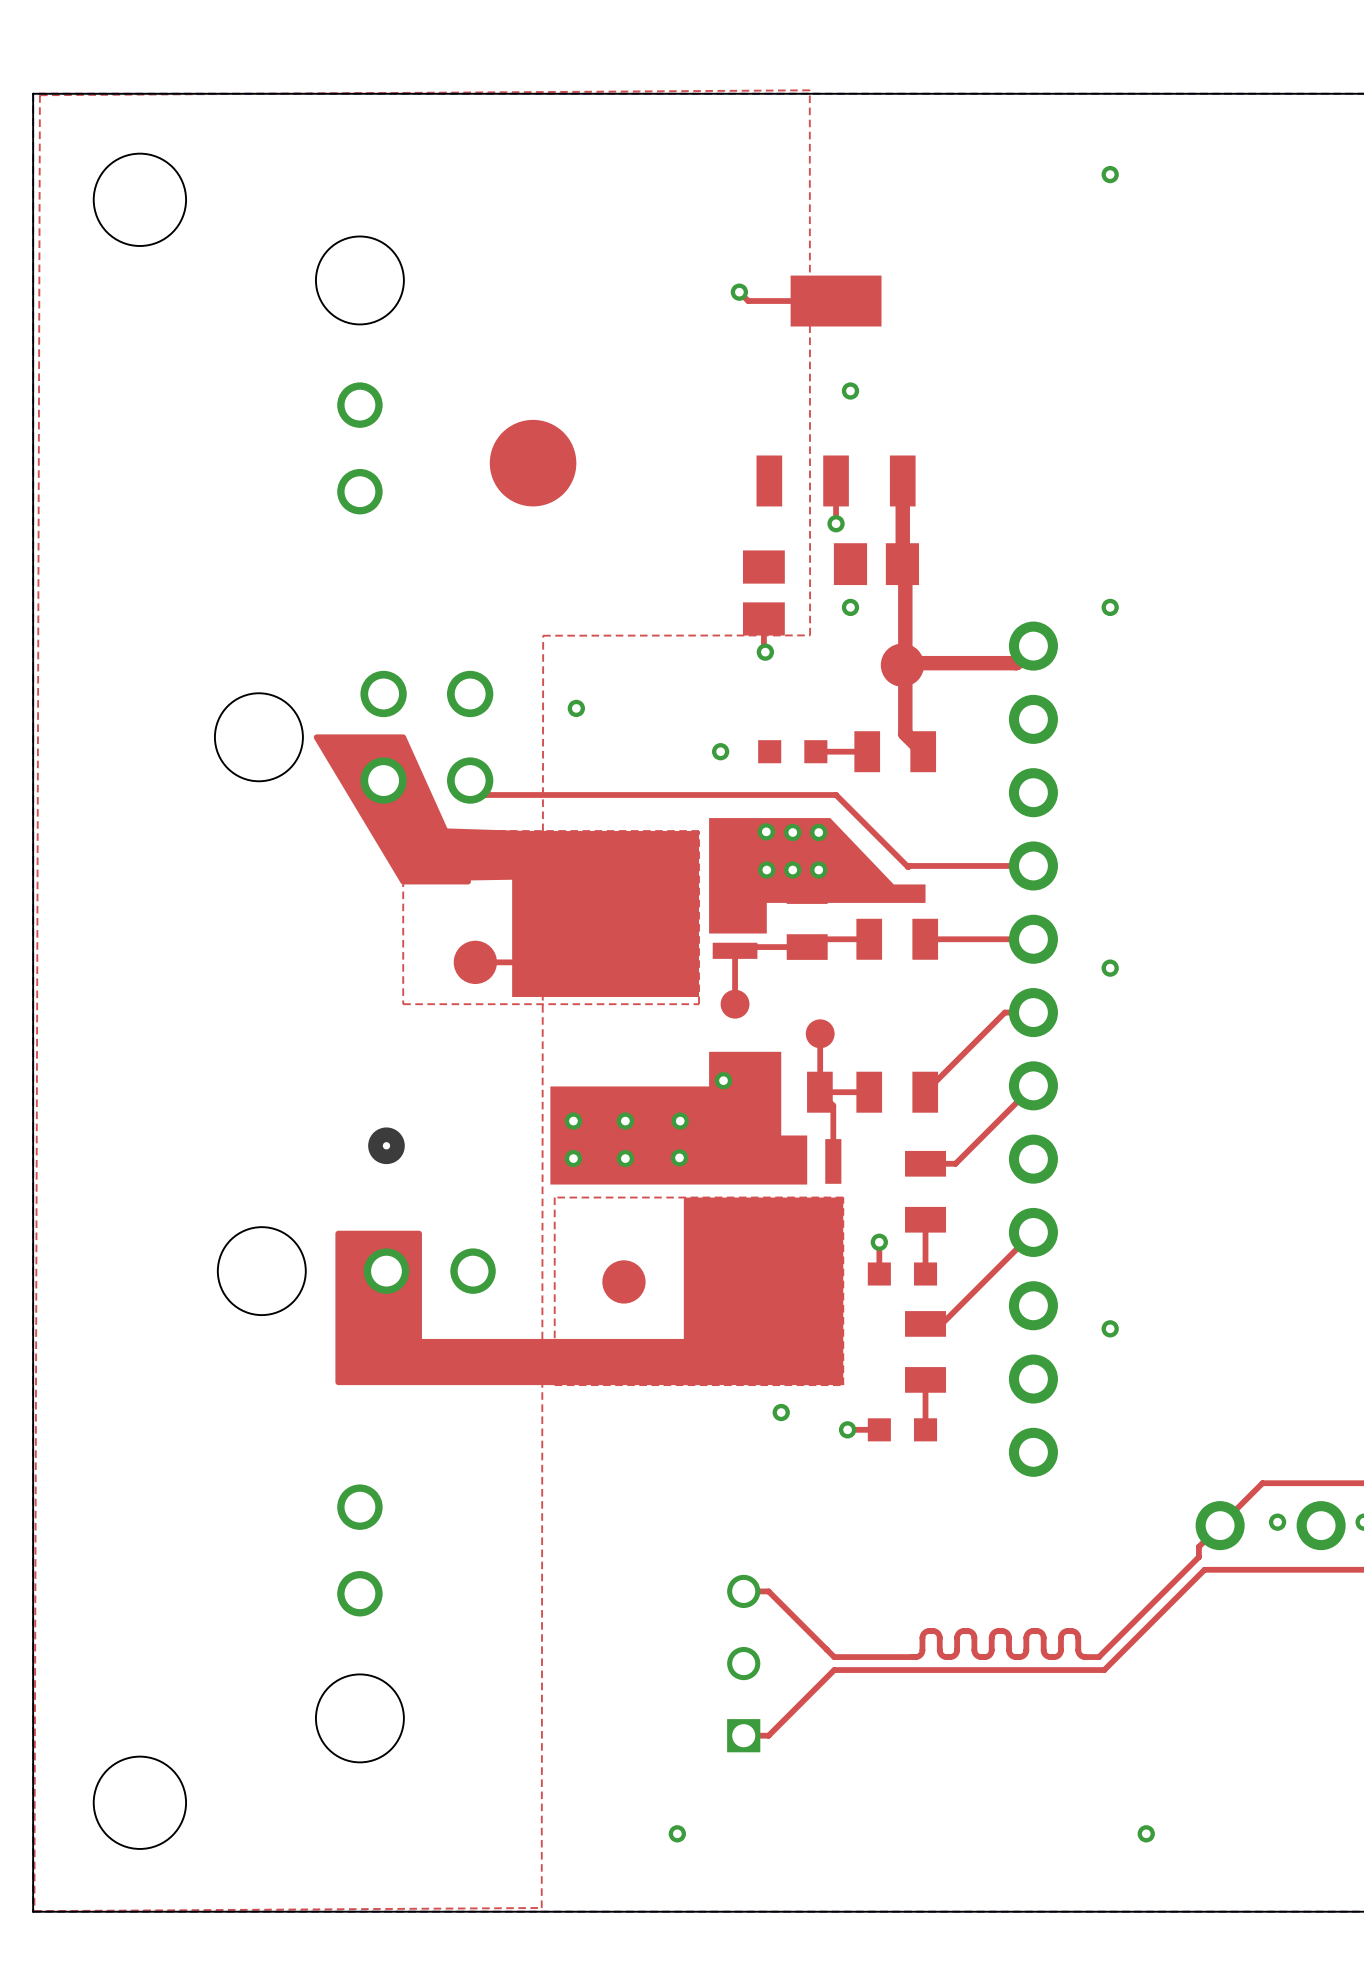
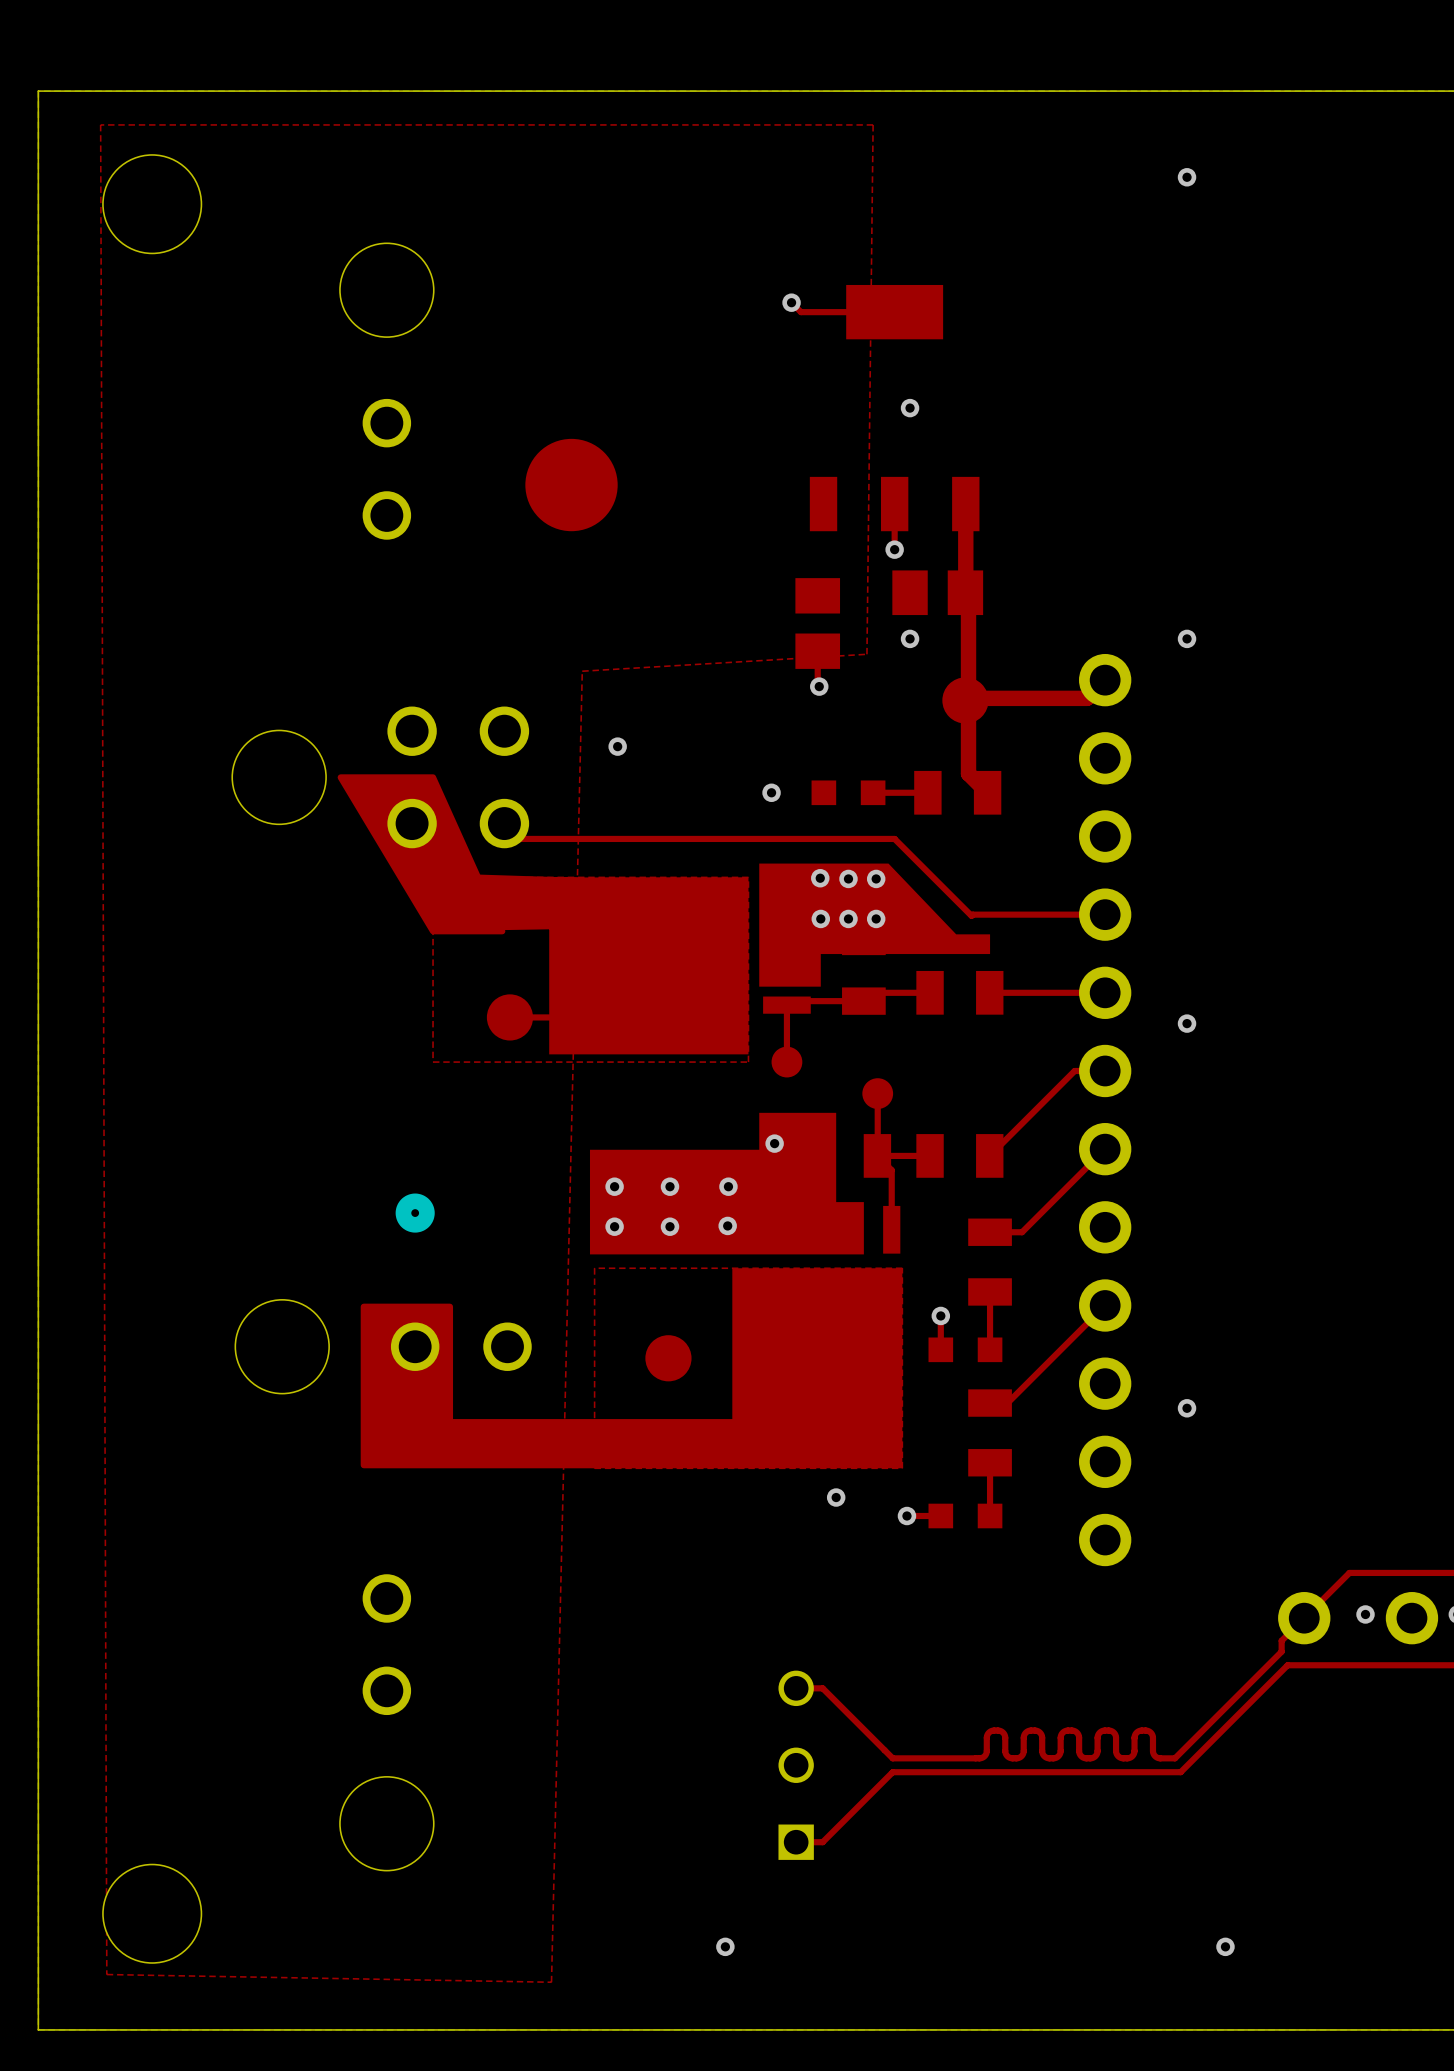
top zone outline: (809, 90) (39, 95) (34, 1911) (541, 1907) (543, 635) (810, 635) (809, 90) -> (873, 124) (866, 654) (582, 671) (551, 1982) (106, 1974) (100, 124) (873, 124)

